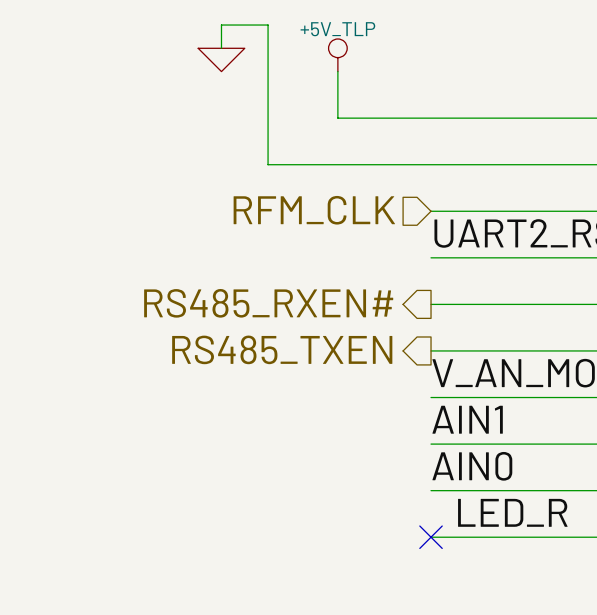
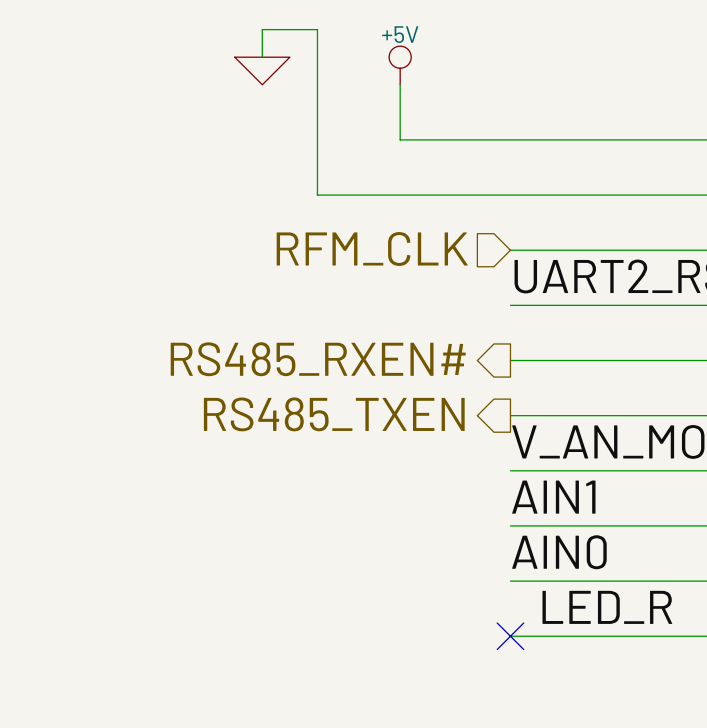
power symbol: +5V_TLP (337, 55) -> +5V (400, 65)

